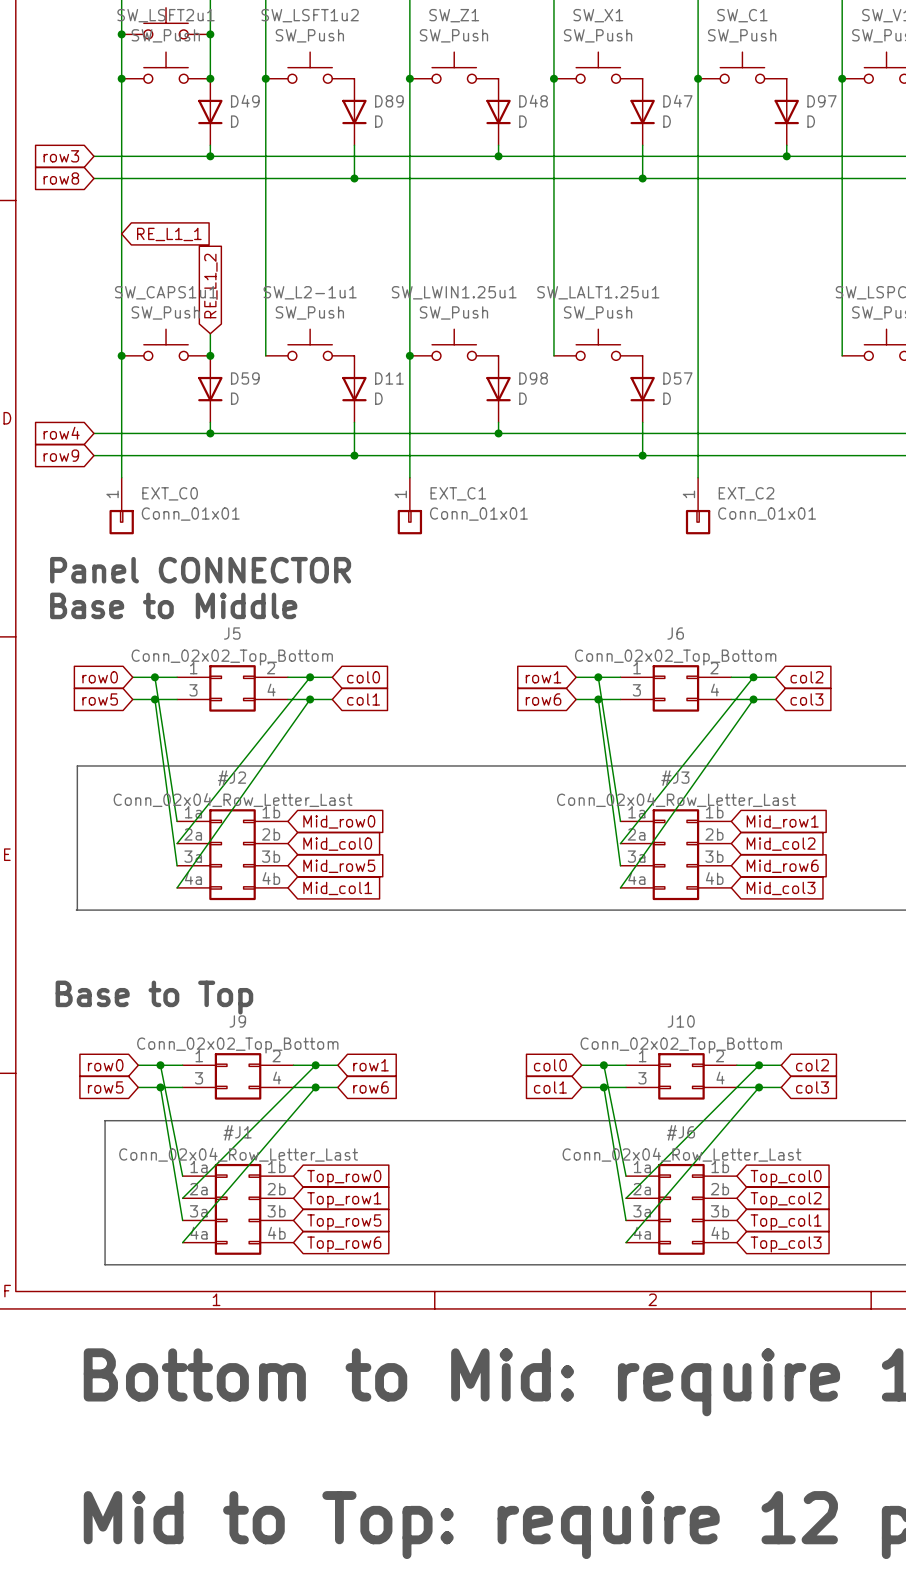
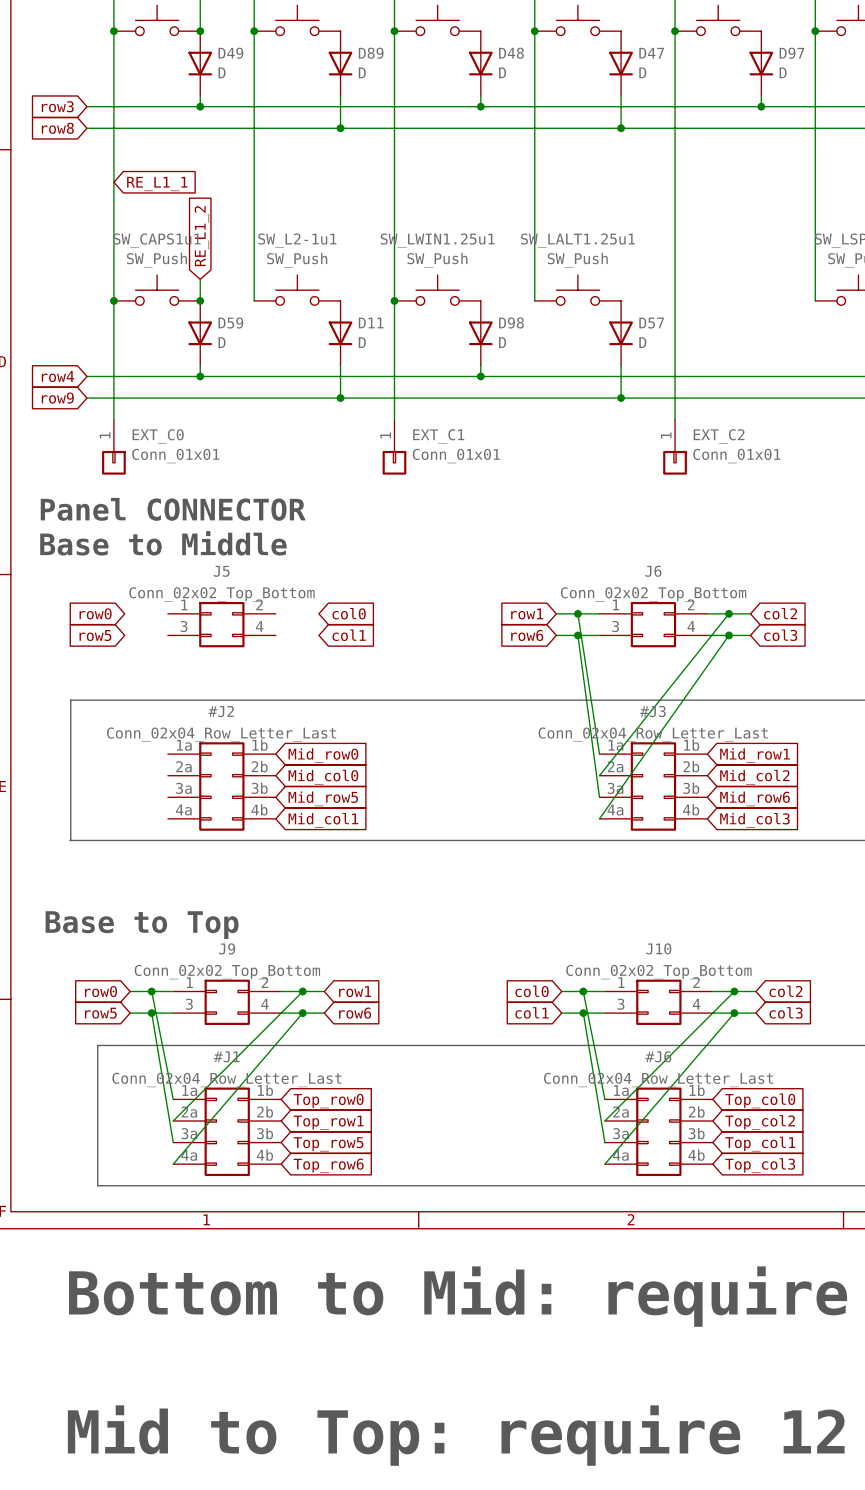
wire: (132, 677) (177, 677) -> none
wire: (154, 677) (177, 821) -> none
junction: (154, 677) -> none
wire: (287, 677) (332, 677) -> none
wire: (310, 677) (177, 843) -> none
junction: (310, 677) -> none
wire: (132, 699) (177, 699) -> none
wire: (154, 699) (177, 865) -> none
junction: (154, 699) -> none
wire: (287, 699) (332, 699) -> none
wire: (310, 699) (177, 887) -> none
junction: (310, 699) -> none

